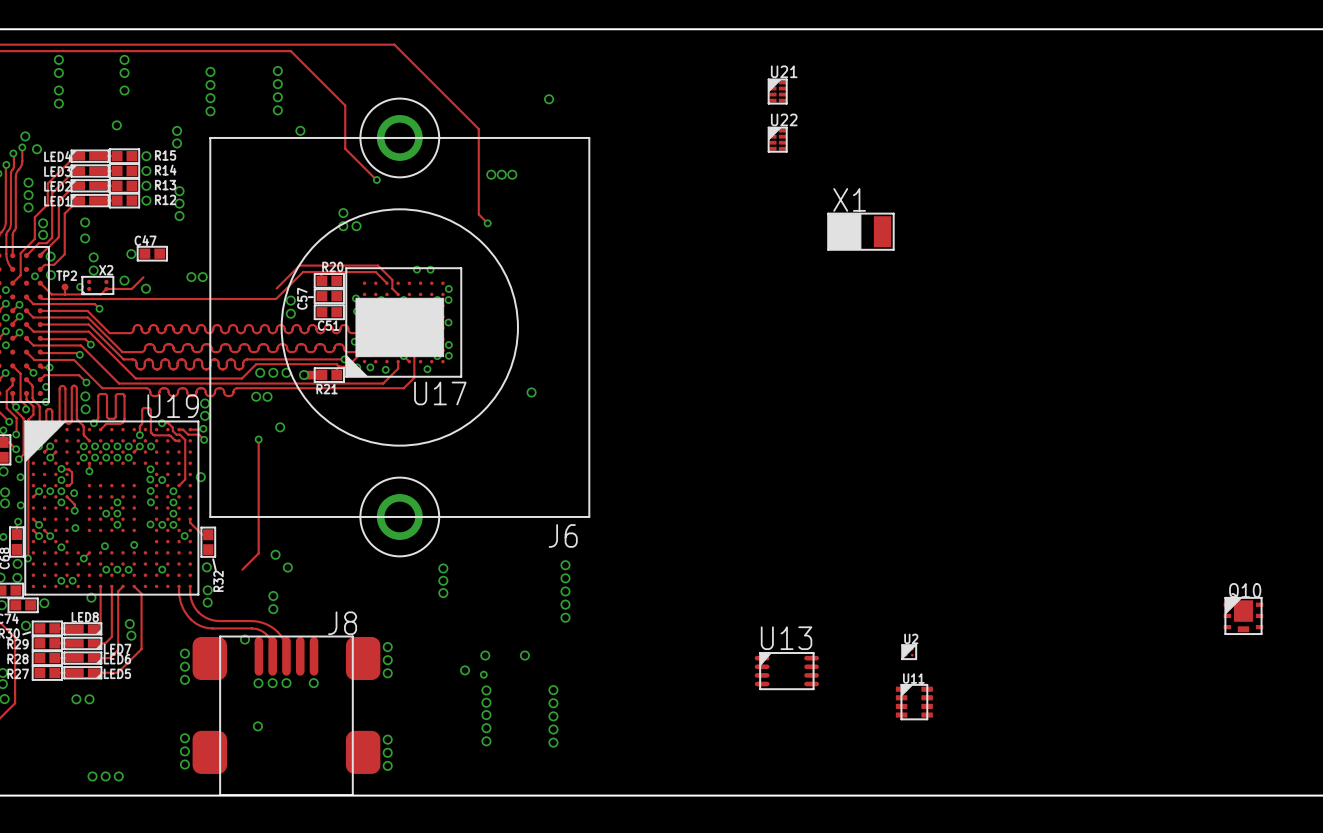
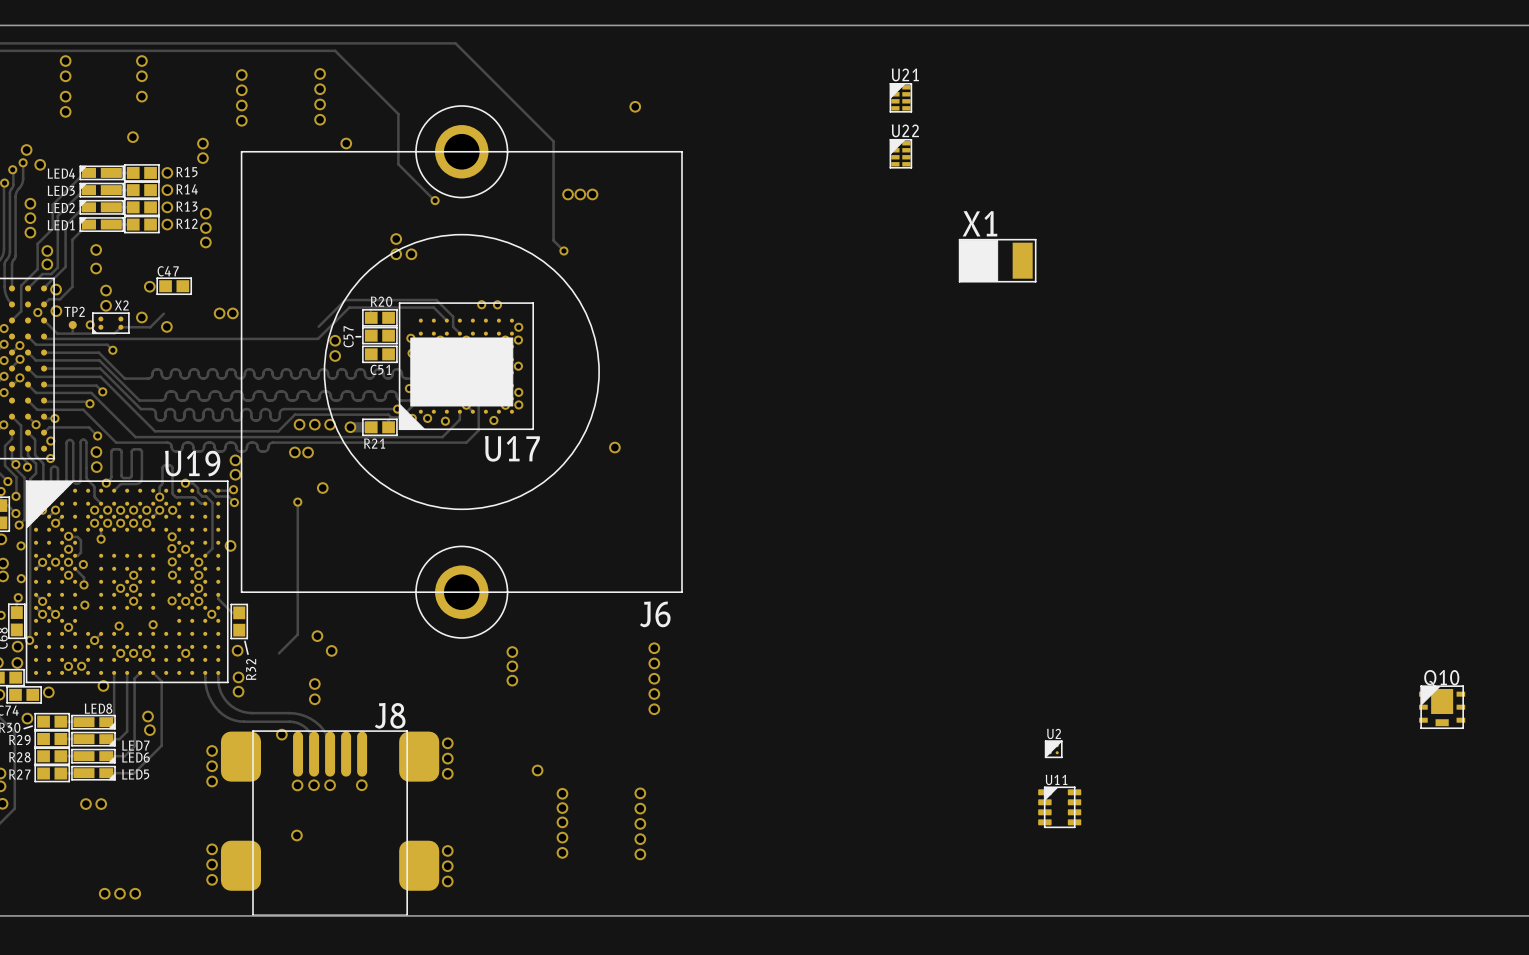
via: (485, 655) -> none
via: (524, 655) -> none
U13: (786, 671) -> none
via: (483, 674) -> none

